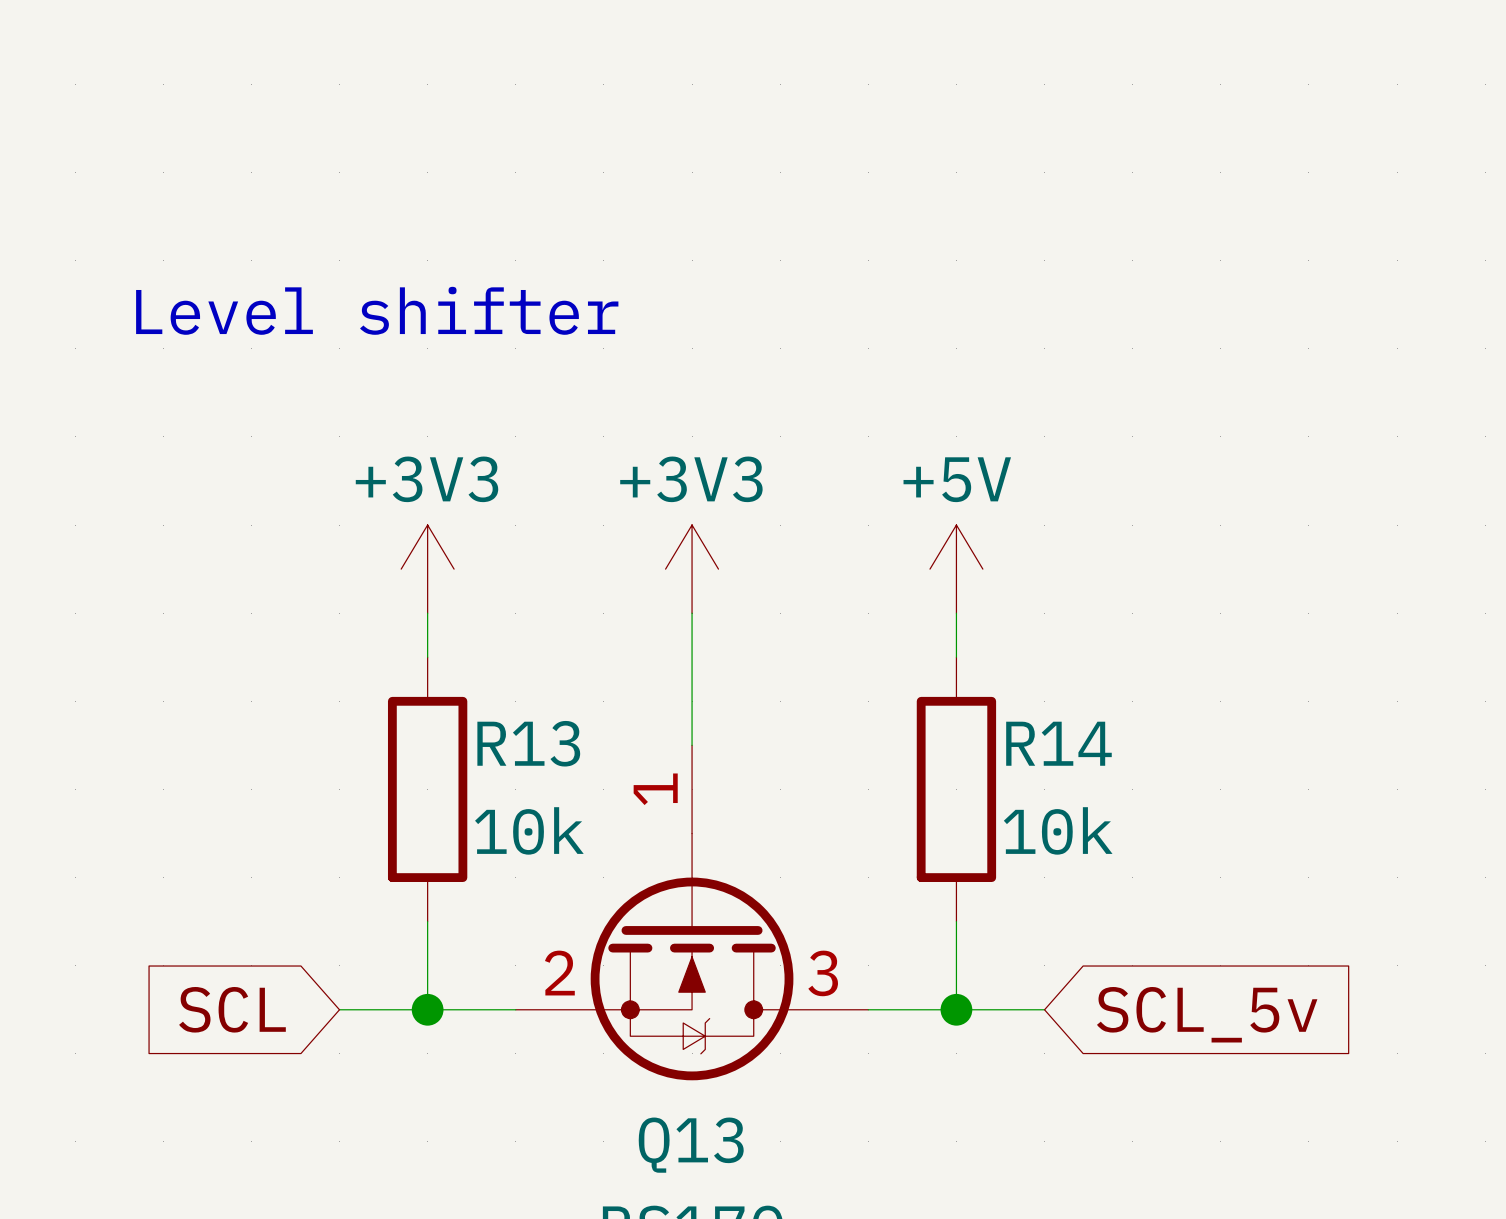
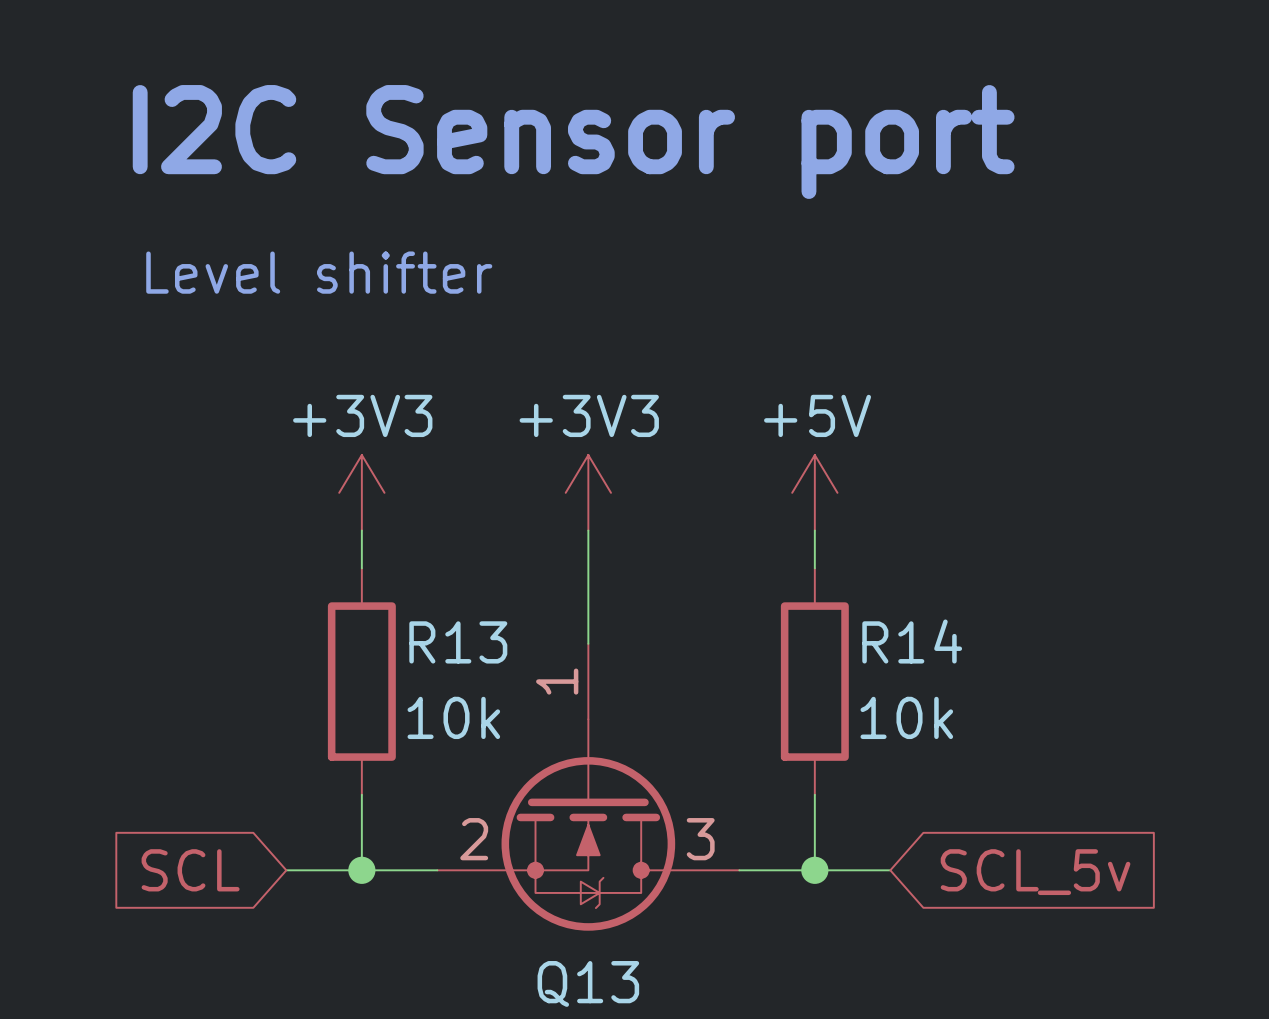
text: none -> I2C Sensor port (573, 142)

